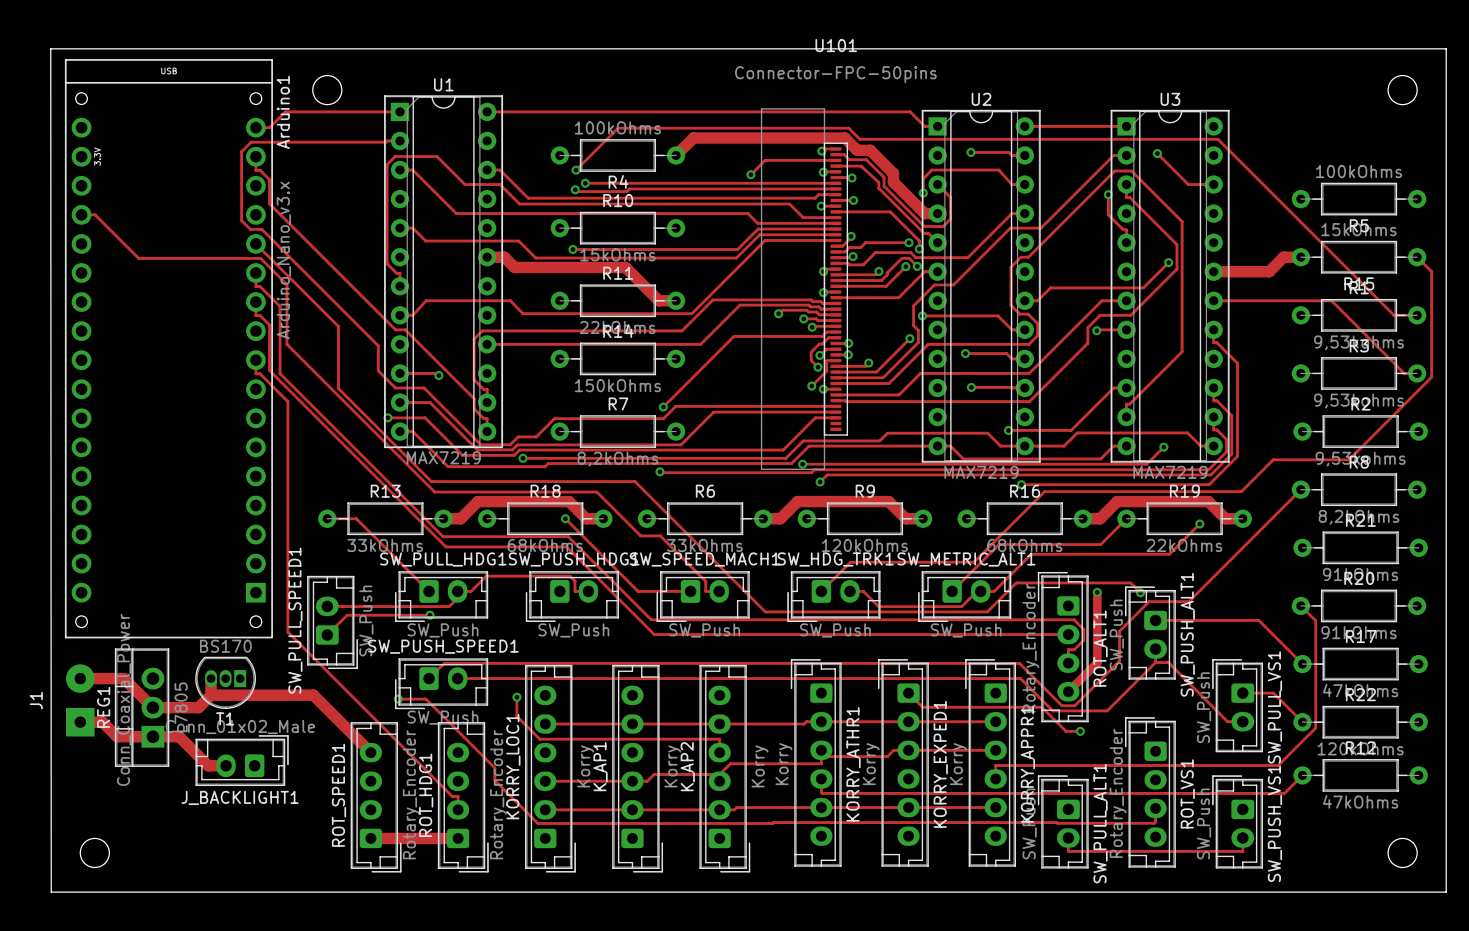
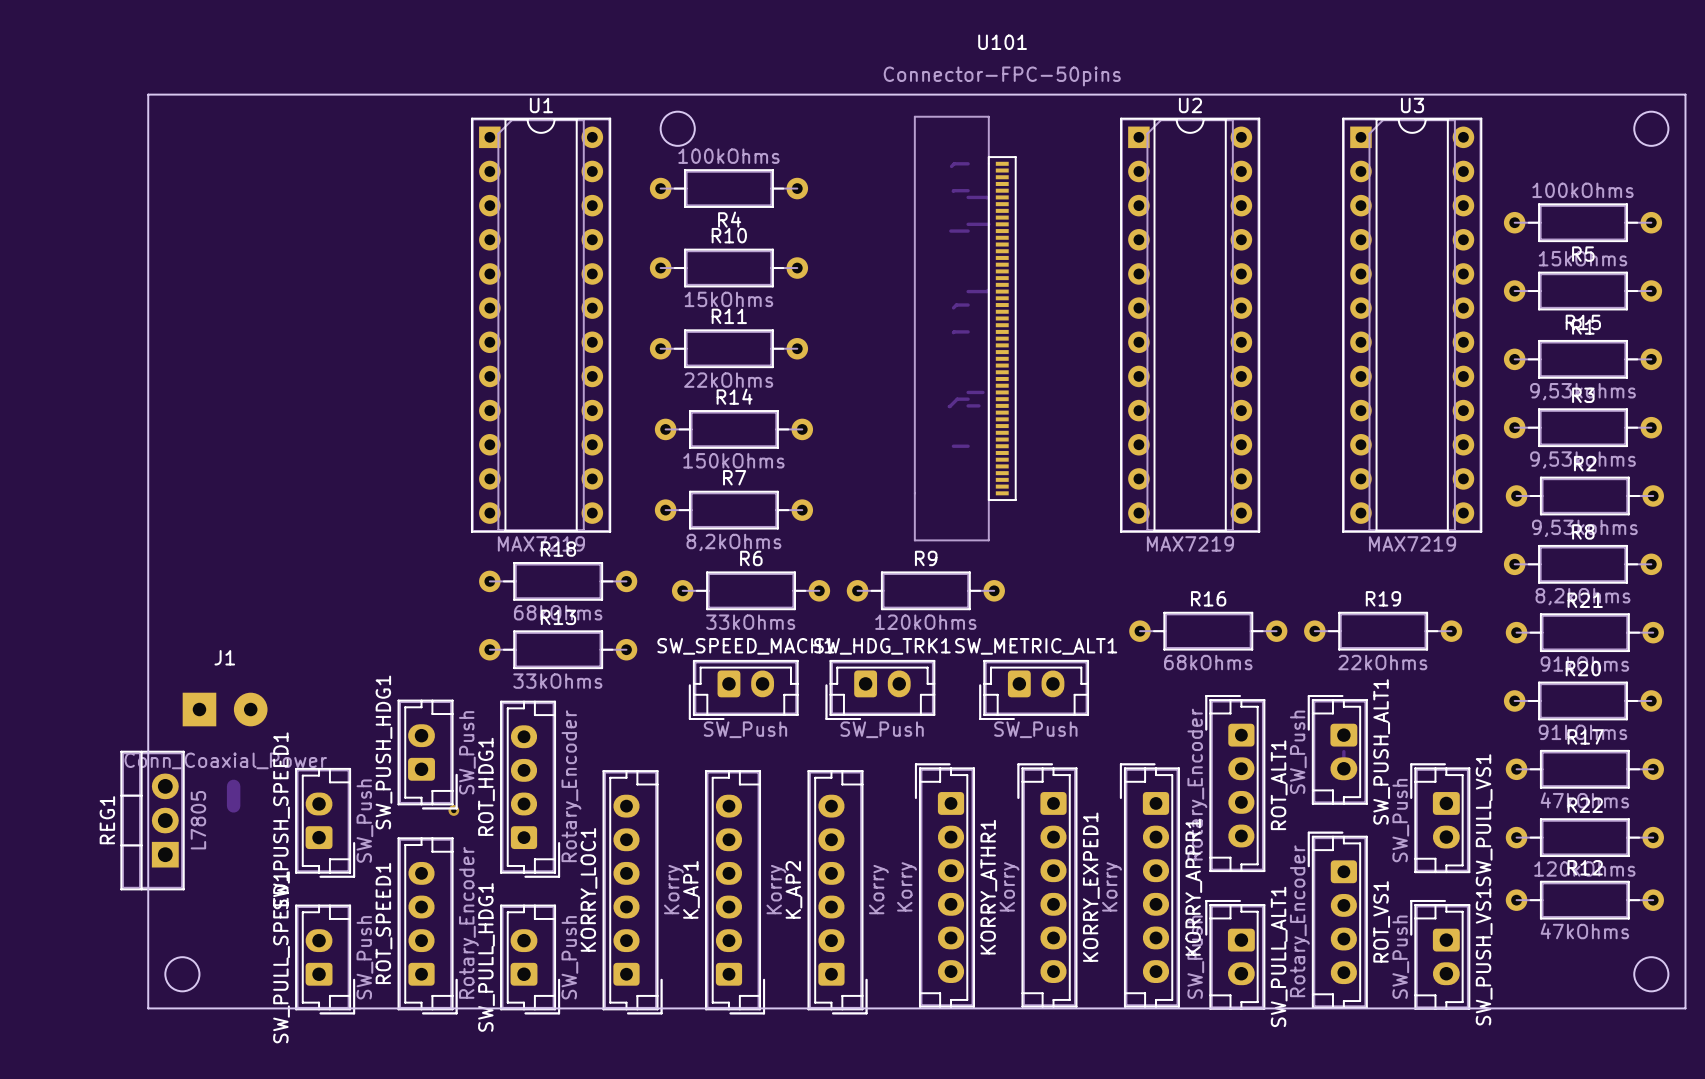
round board edge position: (327, 90) -> (677, 128)
round board edge position: (1402, 90) -> (1651, 128)
board edge: (1446, 90) (1446, 48) (50, 48) (51, 892) (1446, 892) (1446, 867) -> (1685, 94) (148, 94) (148, 1008) (1685, 1008)
track: (399, 111) (285, 111) (269, 127) (255, 127) -> none
track: (487, 111) (910, 111) (924, 126) (937, 126) -> none
track: (1024, 126) (1126, 126) -> none
track: (399, 140) (251, 142) (241, 151) (241, 220) (250, 229) (261, 229) (378, 345) (378, 370) (395, 387) (424, 387) (480, 444) (510, 444) (518, 436) (536, 436) (554, 418) (663, 418) (675, 406) (835, 406) -> none
via: (821, 151) -> none
track: (971, 152) (1008, 152) (1011, 155) (1024, 155) -> none
via: (971, 152) -> none
track: (1157, 153) (1188, 184) (1213, 184) -> none
via: (1157, 153) -> none
track: (835, 154) (844, 154) (849, 159) (866, 159) (883, 177) (883, 186) (924, 226) (943, 226) (950, 219) (950, 197) (937, 184) -> none
R4 position: (617, 155) -> (728, 188)
track: (676, 155) (693, 138) (844, 138) (857, 150) (870, 150) (893, 173) (893, 182) (924, 213) (937, 213) -> none
track: (1126, 155) (1113, 155) (1041, 228) (1010, 228) (953, 284) (934, 284) (913, 305) (913, 325) (918, 330) (918, 342) (883, 377) (835, 377) -> none
track: (255, 156) (255, 170) (260, 170) (269, 179) (269, 203) (395, 329) (405, 329) (474, 398) (474, 409) (483, 418) (487, 418) (487, 431) -> none
track: (835, 160) (765, 160) (750, 174) -> none
track: (835, 166) (861, 166) (878, 182) (878, 188) (924, 233) (928, 233) (937, 242) -> none
track: (399, 170) (412, 170) (456, 213) (747, 213) (757, 223) (835, 223) -> none
track: (487, 170) (500, 170) (528, 198) (815, 198) (818, 194) (835, 194) -> none
track: (576, 170) (618, 128) (848, 128) (859, 139) (1217, 139) (1394, 315) (1417, 315) -> none
via: (576, 170) -> none
via: (823, 172) -> none
via: (750, 174) -> none
via: (851, 177) -> none
track: (585, 183) (835, 183) -> none
via: (585, 183) -> none
track: (1024, 184) (1011, 184) (998, 170) (931, 170) (923, 178) (923, 193) -> none
track: (1126, 184) (1126, 197) (1129, 197) (1176, 244) (1176, 269) (1130, 315) (1100, 315) (1087, 327) (1087, 343) (1029, 401) (835, 400) -> none
via: (575, 189) -> none
track: (835, 189) (629, 189) (626, 191) (577, 191) (575, 189) -> none
via: (923, 193) -> none
track: (1108, 194) (1108, 214) (1123, 229) (1126, 229) (1126, 242) -> none
via: (1108, 194) -> none
via: (853, 200) -> none
via: (821, 206) -> none
track: (835, 211) (890, 211) (919, 240) (919, 249) -> none
track: (1024, 213) (1011, 213) (967, 257) (915, 257) (910, 252) (875, 252) (863, 264) (835, 263) -> none
track: (81, 214) (95, 214) (138, 258) (260, 258) (286, 284) (286, 344) (434, 492) (596, 492) (640, 535) (660, 535) (705, 581) (705, 591) (719, 591) -> none
track: (835, 217) (803, 217) (789, 204) (519, 204) (500, 184) (464, 184) (436, 156) (395, 156) (387, 164) (387, 263) (396, 273) (399, 273) (399, 286) -> none
track: (399, 228) (412, 228) (425, 241) (518, 241) (535, 258) (736, 258) (759, 234) (835, 234) -> none
R10 position: (617, 228) -> (728, 268)
track: (835, 229) (758, 229) (737, 249) (572, 249) -> none
track: (851, 236) (842, 246) (835, 246) -> none
via: (851, 236) -> none
track: (835, 240) (765, 240) (691, 313) (522, 313) (510, 300) (426, 300) (412, 315) (399, 315) -> none
track: (908, 242) (865, 242) (860, 247) (849, 247) (845, 251) (835, 251) -> none
via: (908, 242) -> none
track: (255, 243) (338, 326) (338, 388) (431, 481) (635, 481) (765, 611) (987, 611) (1016, 582) (1130, 582) (1140, 592) -> none
via: (572, 249) -> none
via: (919, 249) -> none
via: (853, 256) -> none
track: (487, 257) (504, 257) (514, 267) (625, 267) (658, 300) (676, 300) -> none
track: (1300, 257) (1283, 257) (1269, 271) (1213, 271) -> none
track: (1417, 257) (1431, 271) (1431, 377) (1349, 459) (1273, 459) (1241, 491) (1044, 491) (974, 562) (850, 562) (821, 591) -> none
track: (1168, 262) (1143, 287) (1050, 287) (1037, 300) (1024, 300) -> none
via: (1168, 262) -> none
track: (905, 266) (886, 286) (835, 286) -> none
via: (905, 266) -> none
track: (917, 266) (909, 258) (901, 258) (881, 280) (835, 280) -> none
via: (917, 266) -> none
U1 position: (443, 271) -> (541, 325)
via: (823, 271) -> none
track: (878, 271) (875, 274) (835, 274) -> none
via: (878, 271) -> none
track: (937, 271) (924, 271) (898, 297) (835, 297) -> none
track: (255, 272) (255, 286) (260, 286) (280, 306) (280, 373) (443, 536) (568, 536) (651, 619) (1074, 619) (1083, 629) (1083, 640) (1074, 649) (1068, 649) (1068, 663) -> none
U2 position: (981, 286) -> (1190, 325)
U3 position: (1170, 286) -> (1412, 325)
U101 position: (804, 289) -> (965, 328)
via: (823, 292) -> none
R11 position: (617, 300) -> (728, 348)
track: (1126, 300) (1101, 300) (1029, 373) (920, 373) (898, 394) (835, 394) -> none
track: (1213, 300) (1331, 300) (1404, 373) (1417, 373) -> none
track: (255, 302) (255, 315) (260, 315) (269, 325) (269, 370) (446, 546) (566, 546) (654, 634) (1068, 634) -> none
track: (835, 303) (822, 303) (811, 299) (712, 299) (681, 330) (482, 330) (474, 339) (474, 379) (483, 389) (487, 389) (487, 402) -> none
track: (835, 309) (821, 309) (808, 305) (739, 305) (700, 344) (487, 344) -> none
track: (778, 313) (782, 310) (806, 310) (816, 312) (819, 314) (835, 314) -> none
via: (778, 313) -> none
track: (922, 315) (998, 315) (1011, 329) (1024, 329) -> none
via: (922, 315) -> none
track: (803, 318) (835, 320) -> none
via: (803, 318) -> none
track: (835, 326) (812, 327) -> none
via: (812, 327) -> none
track: (1126, 329) (1096, 330) -> none
track: (1213, 329) (1213, 342) (1216, 342) (1237, 363) (1237, 456) (1209, 484) (1021, 484) -> none
via: (1096, 330) -> none
track: (835, 332) (826, 332) (822, 336) (733, 336) (663, 407) -> none
track: (835, 337) (828, 337) (811, 352) (811, 360) (817, 367) -> none
track: (909, 338) (876, 372) (835, 372) -> none
via: (909, 338) -> none
via: (848, 343) -> none
Arduino1: Arduino_Nano_v3.x (168, 348) -> none
track: (965, 353) (1006, 353) (1011, 358) (1024, 358) -> none
via: (965, 353) -> none
via: (848, 354) -> none
via: (819, 355) -> none
R14 position: (617, 358) -> (733, 429)
track: (255, 360) (255, 373) (260, 373) (287, 401) (287, 632) (452, 796) (458, 796) (458, 809) -> none
track: (835, 360) (826, 360) (826, 371) (811, 386) -> none
track: (868, 363) (865, 366) (835, 366) -> none
via: (868, 363) -> none
via: (817, 367) -> none
track: (399, 373) (436, 373) (438, 375) -> none
via: (438, 375) -> none
track: (835, 383) (889, 383) (928, 344) (1028, 344) (1037, 335) (1037, 323) (1028, 314) (1019, 314) (1010, 305) (1010, 267) (1020, 257) (1028, 257) (1114, 171) (1131, 171) (1182, 221) (1182, 351) (1129, 404) (1126, 404) (1126, 417) -> none
via: (811, 386) -> none
track: (971, 387) (1024, 387) -> none
via: (971, 387) -> none
track: (1126, 387) (1113, 387) (1071, 430) (1008, 430) -> none
track: (1213, 387) (1213, 400) (1216, 400) (1231, 415) (1231, 454) (1210, 474) (827, 474) (820, 481) -> none
via: (823, 389) -> none
track: (399, 402) (429, 402) (477, 449) (512, 449) (517, 444) (680, 444) (713, 412) (835, 412) -> none
via: (663, 407) -> none
track: (387, 417) (425, 417) (462, 455) (514, 455) (519, 450) (783, 450) (815, 417) (835, 417) -> none
via: (387, 417) -> none
track: (1213, 417) (1213, 429) (1216, 429) (1226, 439) (1226, 451) (1208, 469) (659, 471) -> none
via: (1008, 430) -> none
track: (399, 431) (412, 431) (447, 466) (545, 466) (548, 463) (791, 463) (809, 446) (950, 446) (963, 458) (1100, 458) (1113, 446) (1126, 446) -> none
R7 position: (617, 431) -> (733, 510)
track: (1213, 446) (1200, 446) (1187, 432) (1077, 432) (1064, 446) (1000, 446) (987, 433) (887, 433) (879, 440) (803, 440) (785, 458) (523, 458) -> none
track: (1163, 447) (1146, 464) (802, 464) -> none
via: (1163, 447) -> none
via: (523, 458) -> none
via: (802, 464) -> none
via: (659, 471) -> none
via: (820, 481) -> none
via: (1021, 484) -> none
track: (1300, 489) (1188, 601) (1149, 601) (1119, 631) (1119, 661) (1074, 705) (1061, 705) (1019, 663) (444, 663) (429, 678) -> none
track: (327, 518) (356, 518) (429, 591) -> none
R13 position: (385, 518) -> (558, 649)
track: (443, 518) (460, 518) (477, 501) (569, 501) (586, 518) (603, 518) -> none
R18 position: (545, 518) -> (558, 581)
track: (565, 518) (638, 591) (690, 591) -> none
via: (565, 518) -> none
R6 position: (705, 518) -> (751, 590)
track: (763, 518) (780, 518) (797, 501) (888, 501) (905, 518) (923, 518) -> none
R9 position: (864, 518) -> (925, 590)
R16 position: (1024, 518) -> (1208, 631)
track: (1082, 518) (1100, 518) (1117, 501) (1208, 501) (1225, 518) (1242, 518) -> none
track: (1126, 518) (1100, 544) (998, 544) (952, 591) -> none
R19 position: (1184, 518) -> (1383, 631)
track: (1199, 523) (1169, 554) (1031, 554) (994, 591) (974, 591) (974, 594) (961, 606) (878, 606) (863, 591) (849, 591) -> none
via: (1199, 523) -> none
track: (457, 591) (471, 591) (486, 576) (570, 576) (574, 581) (574, 591) (588, 591) -> none
track: (464, 591) (449, 606) (327, 606) -> none
track: (1097, 592) (1097, 662) (1068, 691) -> none
via: (1097, 592) -> none
via: (1140, 592) -> none
SW_PULL_HDG1 rotation: 0° (441, 596) -> 90° counterclockwise (530, 959)
SW_PULL_HDG1 position: (441, 596) -> (530, 959)
SW_PUSH_HDG1 rotation: 0° (572, 596) -> 90° counterclockwise (427, 754)
SW_PUSH_HDG1 position: (572, 596) -> (427, 754)
SW_SPEED_MACH1 position: (703, 596) -> (743, 689)
SW_HDG_TRK1 position: (833, 596) -> (880, 689)
SW_METRIC_ALT1 position: (964, 596) -> (1034, 689)
track: (1300, 605) (1315, 620) (1315, 728) (1278, 765) (995, 765) (995, 778) -> none
track: (429, 615) (347, 615) (327, 635) -> none
via: (429, 615) -> none
track: (1155, 620) (1258, 620) (1302, 664) -> none
SW_PULL_SPEED1 position: (332, 622) -> (325, 959)
SW_PUSH_ALT1 position: (1150, 633) -> (1337, 749)
ROT_ALT1 position: (1063, 647) -> (1235, 783)
track: (80, 678) (123, 678) (152, 707) (198, 707) (211, 695) (313, 695) (370, 752) -> none
track: (457, 678) (1020, 678) (1052, 710) (1107, 710) (1155, 662) (1168, 662) (1227, 721) (1242, 721) -> none
T1: BS170 (225, 682) -> none
SW_PUSH_SPEED1 rotation: 0° (441, 683) -> 90° counterclockwise (325, 822)
SW_PUSH_SPEED1 position: (441, 683) -> (325, 822)
track: (908, 693) (922, 707) (1041, 707) (1066, 731) (1080, 731) -> none
track: (1242, 693) (1273, 693) (1302, 722) -> none
track: (516, 697) (516, 716) (539, 739) (719, 739) (719, 752) -> none
via: (516, 697) -> none
track: (398, 699) (425, 699) (494, 767) (494, 780) (537, 823) (1154, 823) (1155, 808) -> none
J1 rotation: 0° (80, 700) -> 90° clockwise (225, 709)
J1 position: (80, 700) -> (225, 709)
track: (995, 721) (545, 724) -> none
track: (80, 722) (102, 722) (117, 736) (179, 736) (208, 765) (226, 765) -> none
via: (1080, 731) -> none
track: (821, 750) (821, 763) (730, 763) (719, 774) -> none
track: (995, 750) (893, 750) (887, 756) (821, 756) -> none
J_BACKLIGHT1: Conn_01x02_Male (242, 760) -> none
track: (719, 774) (654, 774) (647, 781) (545, 781) -> none
track: (1302, 775) (1284, 793) (822, 793) (821, 778) -> none
ROT_HDG1 position: (463, 797) -> (530, 789)
track: (995, 807) (545, 809) -> none
track: (1068, 837) (1068, 851) (1242, 851) (1242, 837) -> none
track: (370, 838) (458, 838) -> none
round board edge position: (94, 852) -> (182, 974)
round board edge position: (1402, 852) -> (1651, 974)

